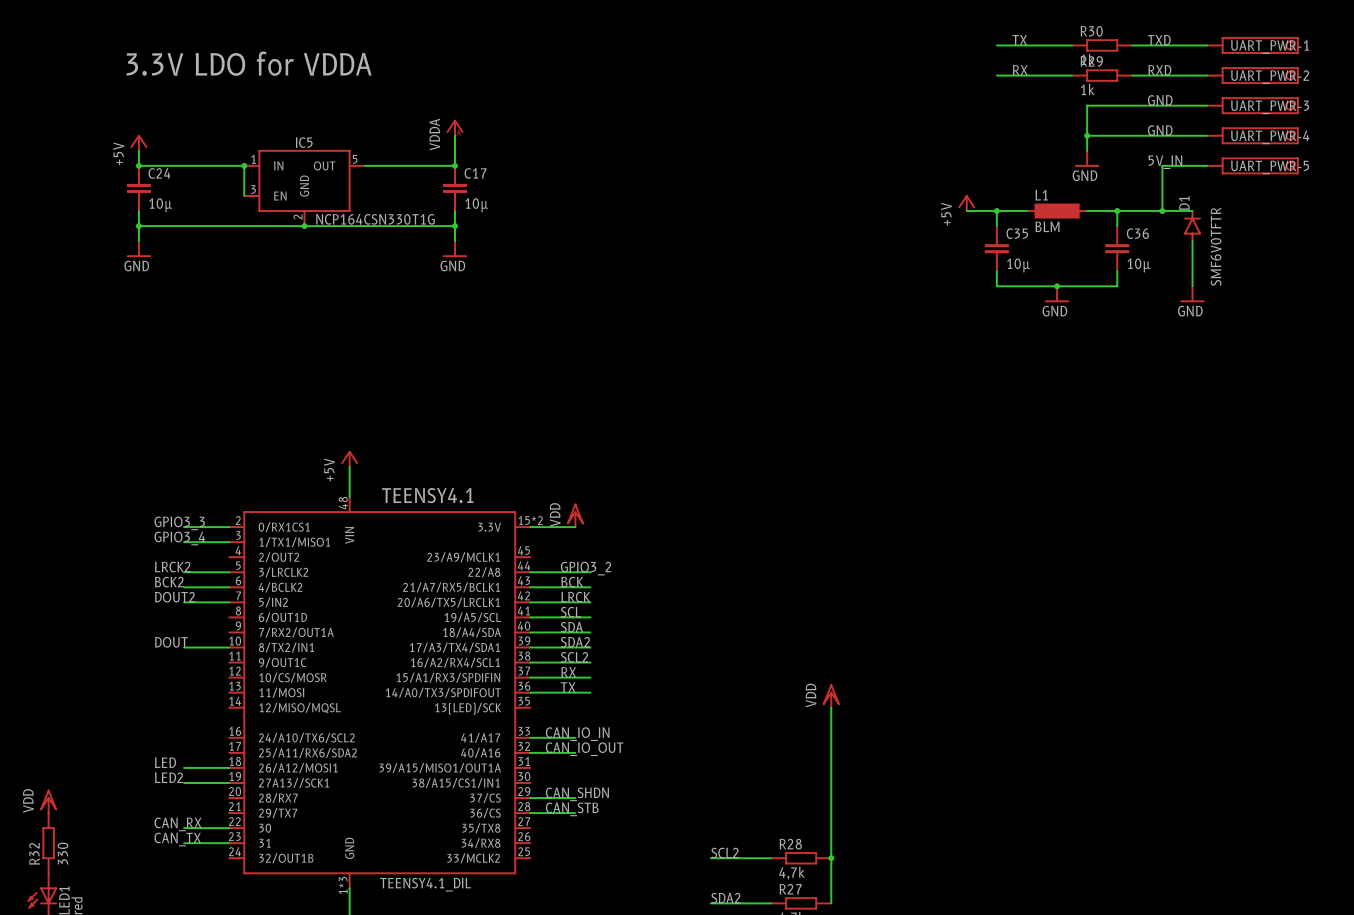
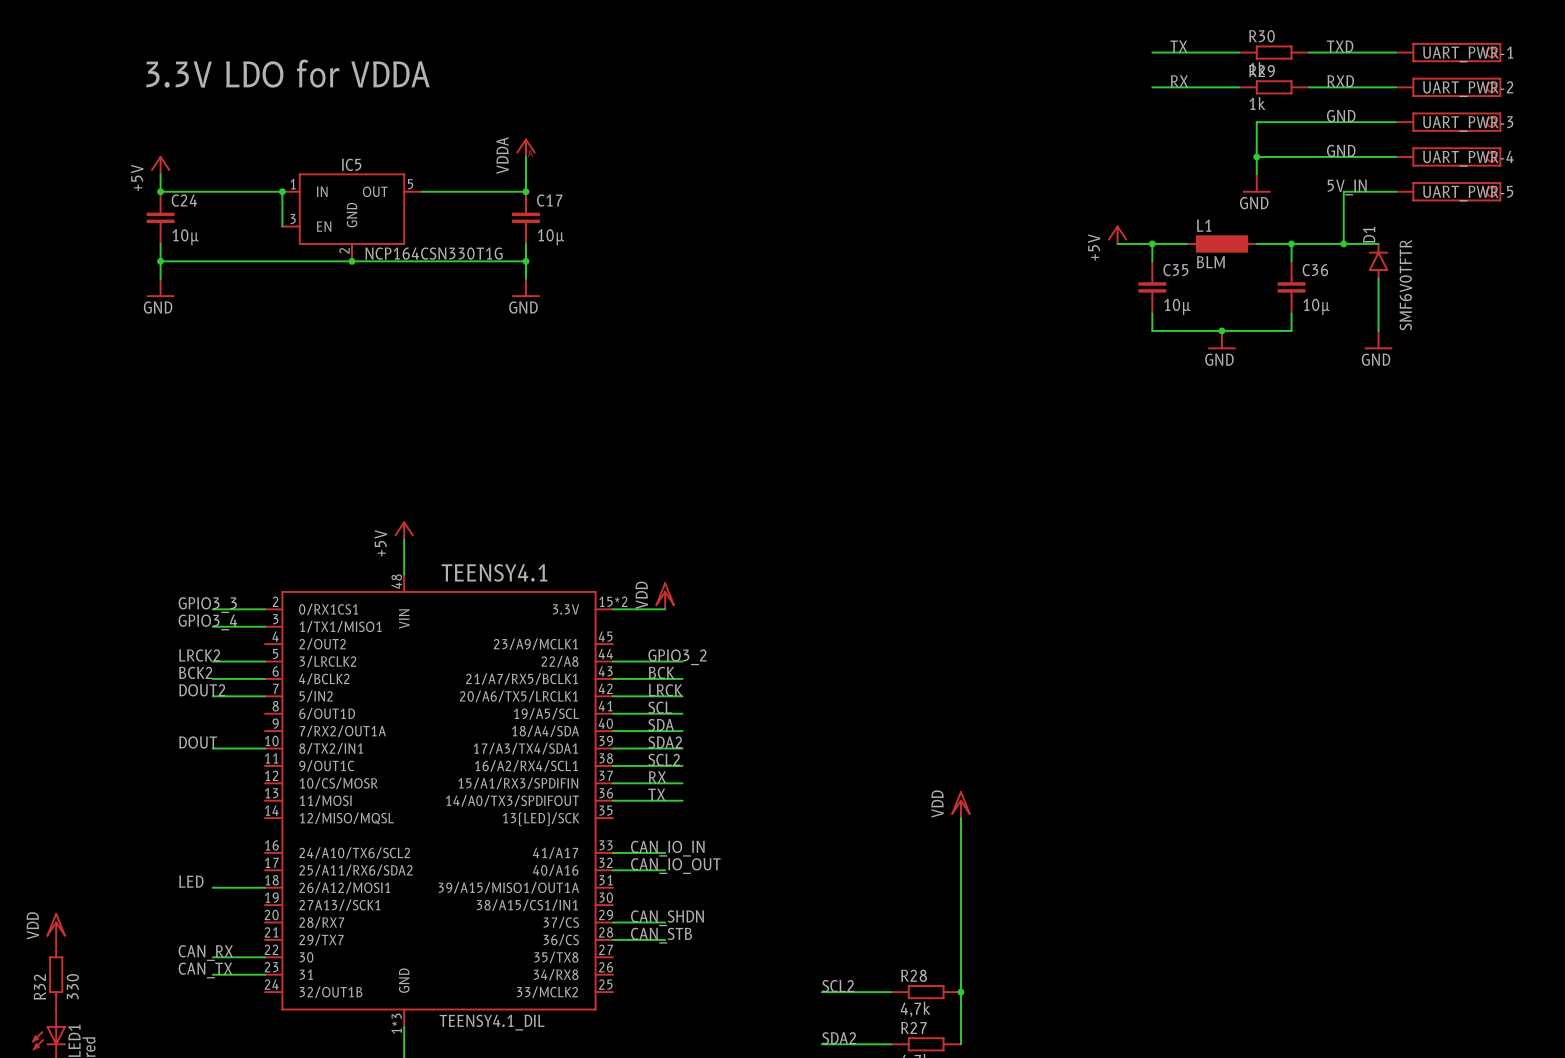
label: LED2 (169, 777) -> none
wire: (184, 782) (229, 782) -> none

